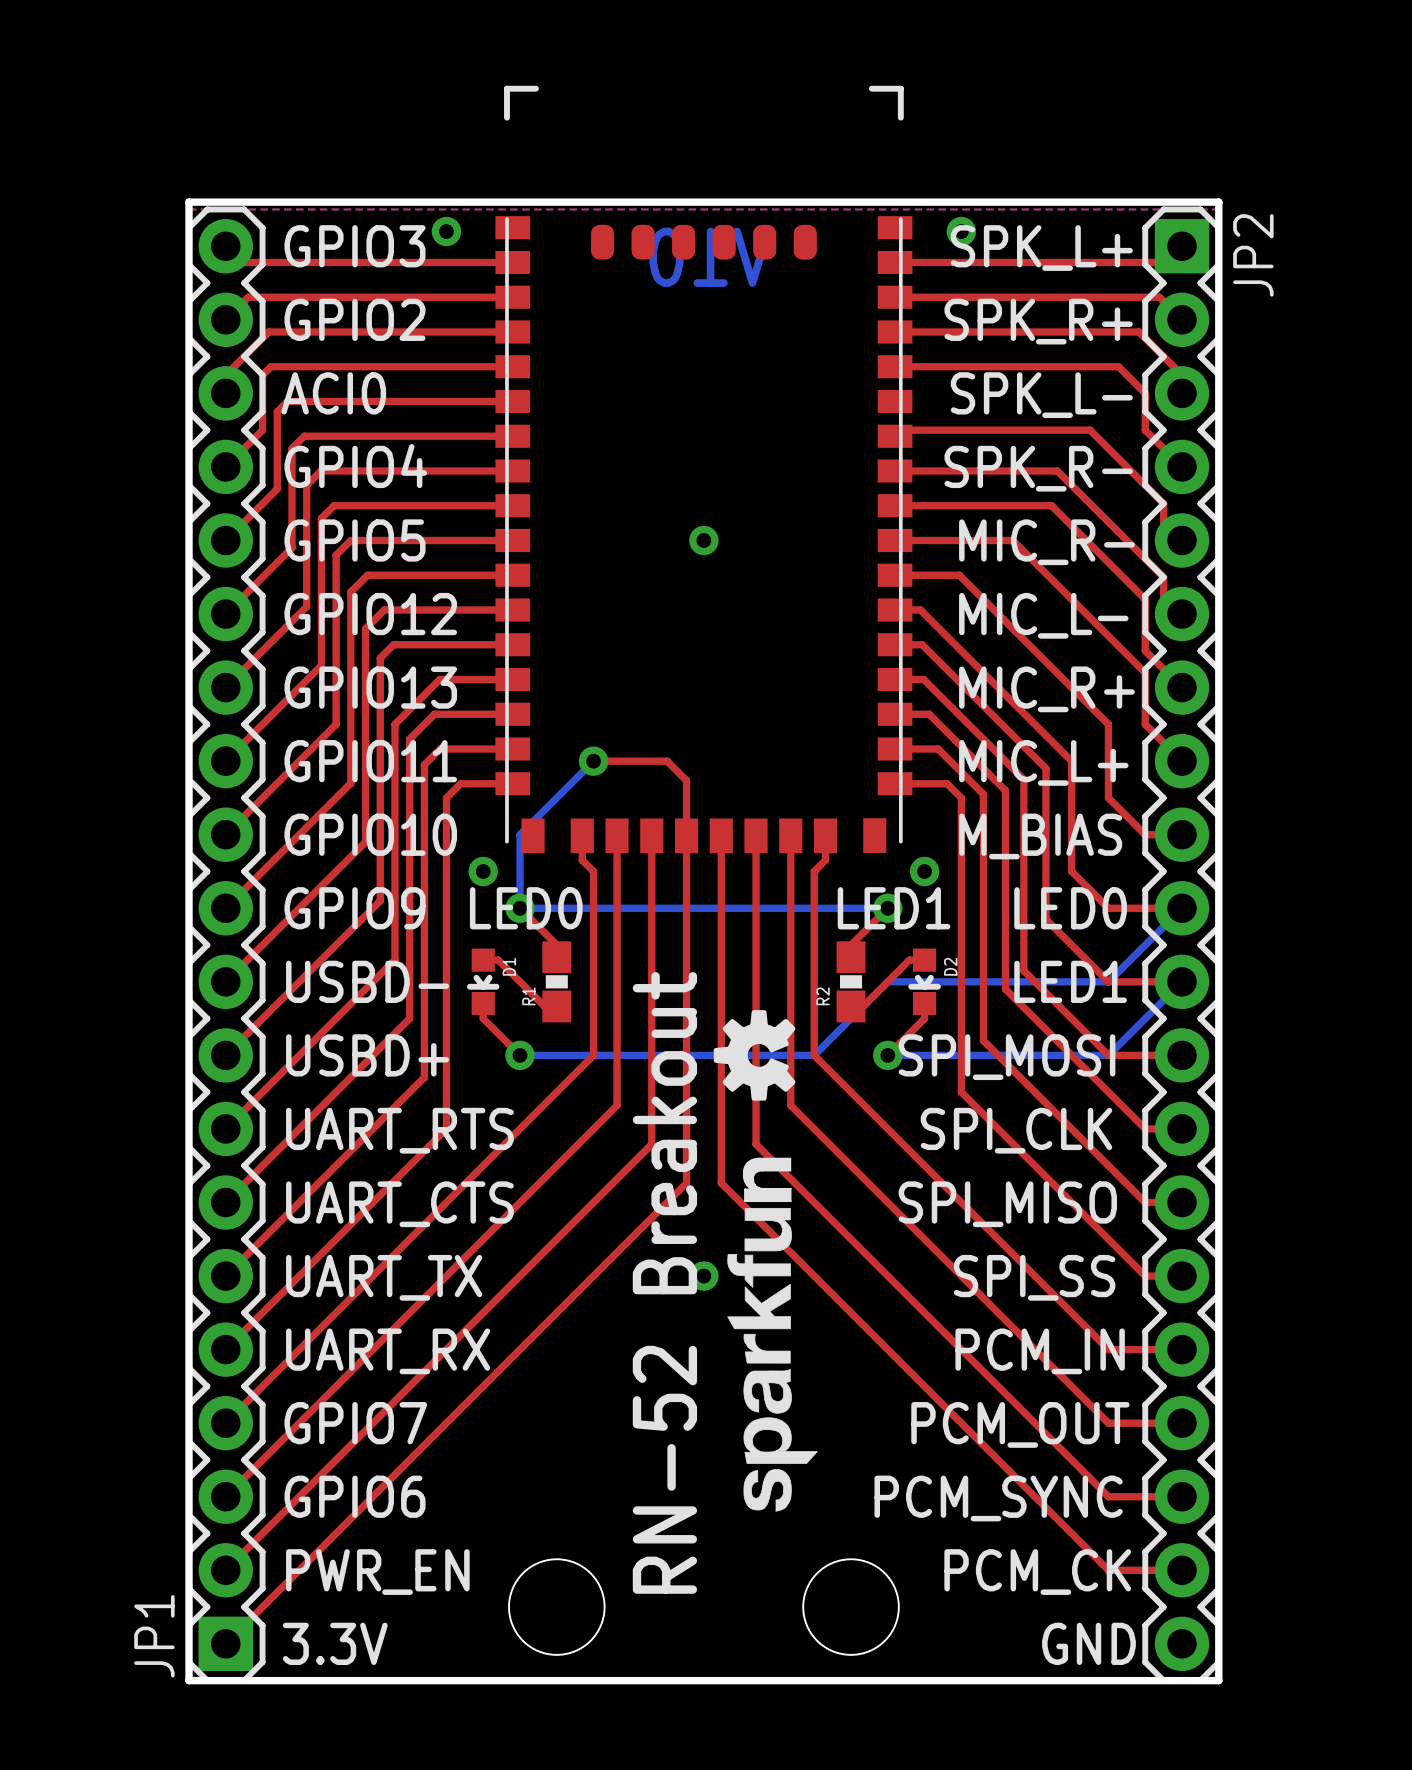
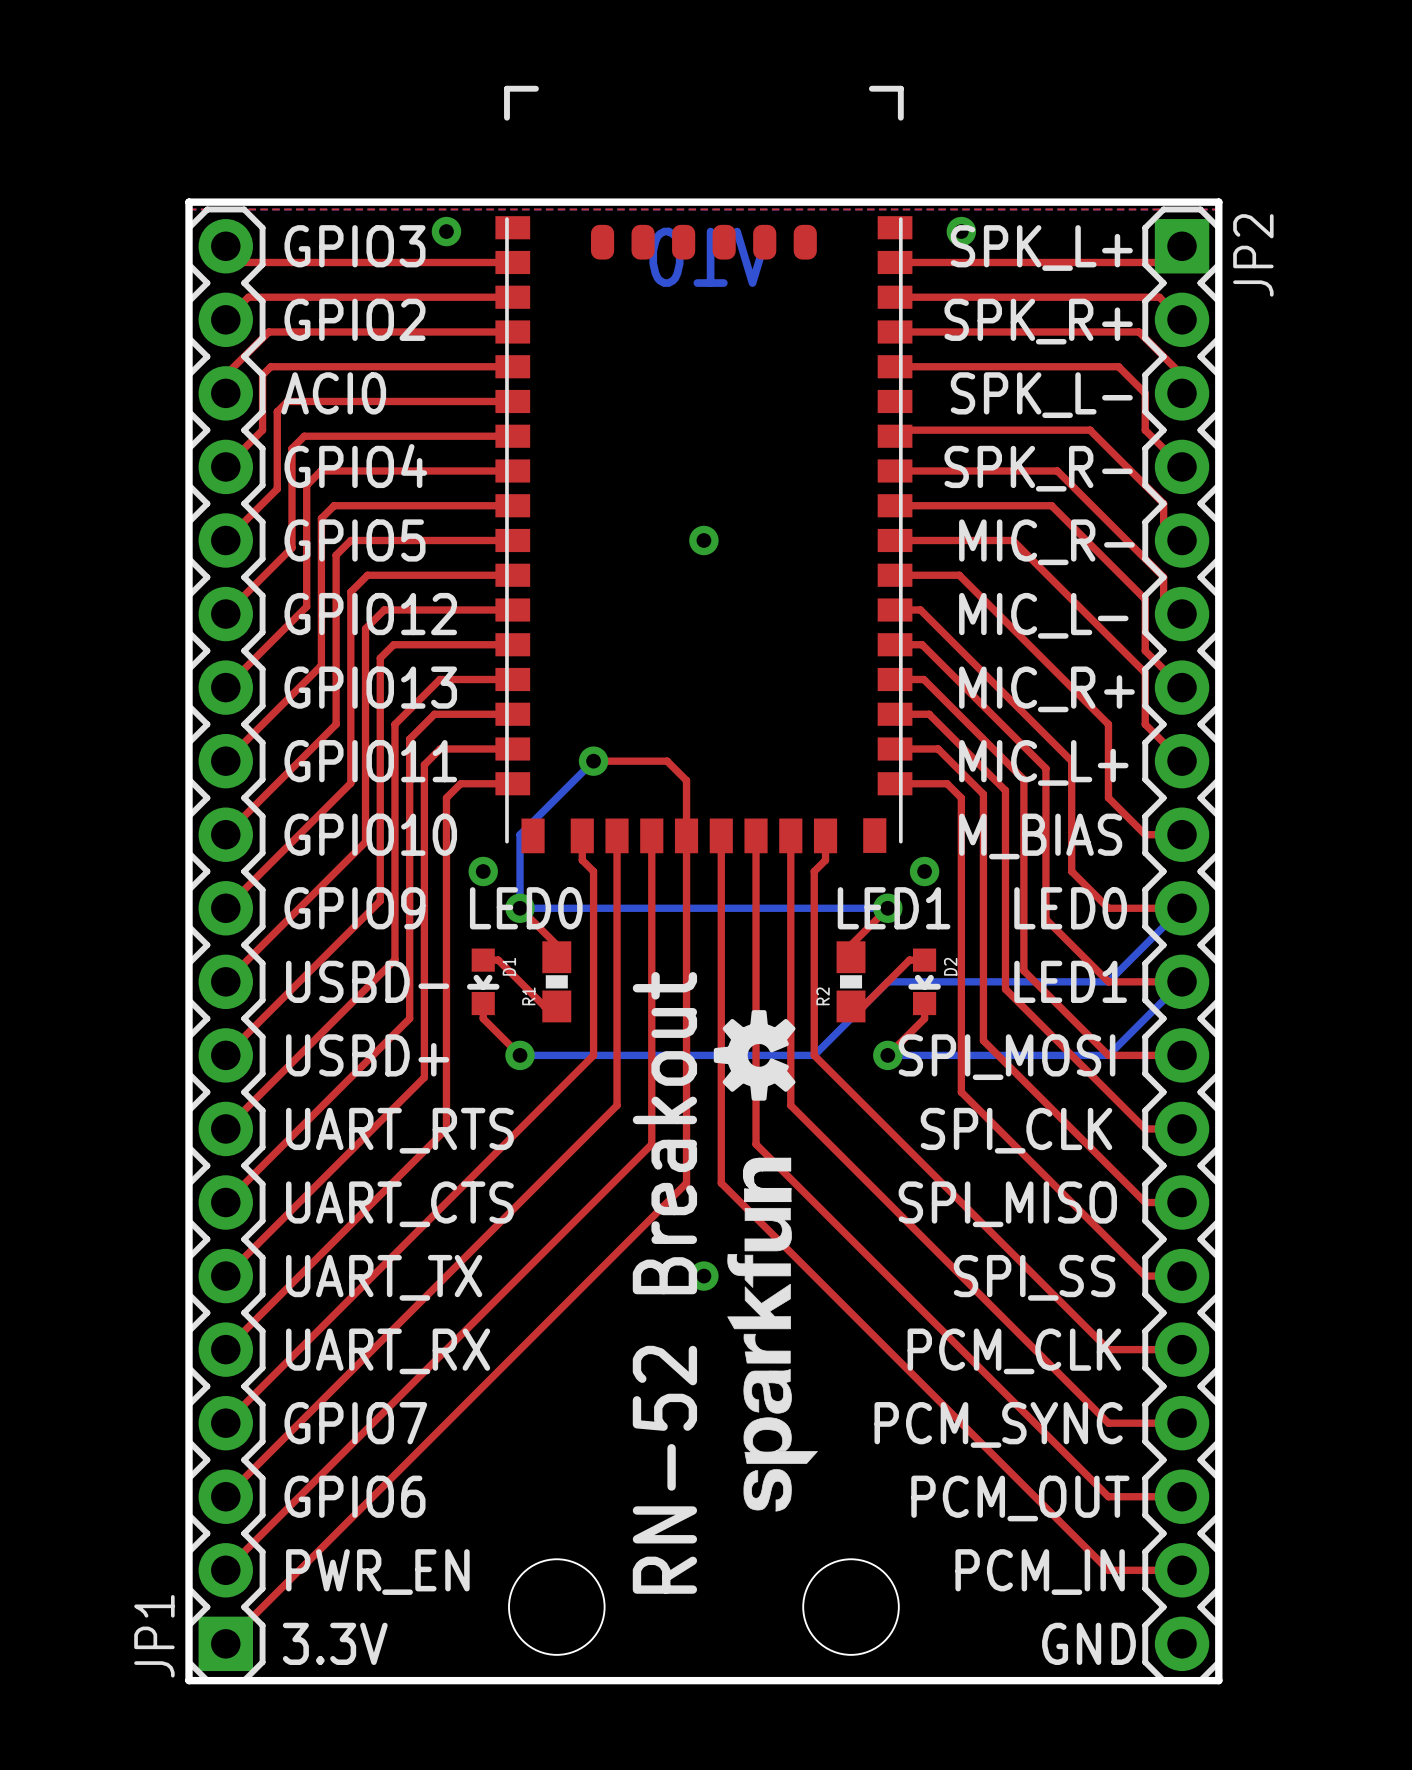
text: none -> PCM_CLK (1014, 1351)
text position: PCM_IN (1040, 1351) -> PCM_IN (1040, 1572)
text position: PCM_OUT (1020, 1424) -> PCM_OUT (1020, 1498)
text position: PCM_SYNC (998, 1498) -> PCM_SYNC (998, 1424)
text: PCM_CK (1037, 1572) -> none

